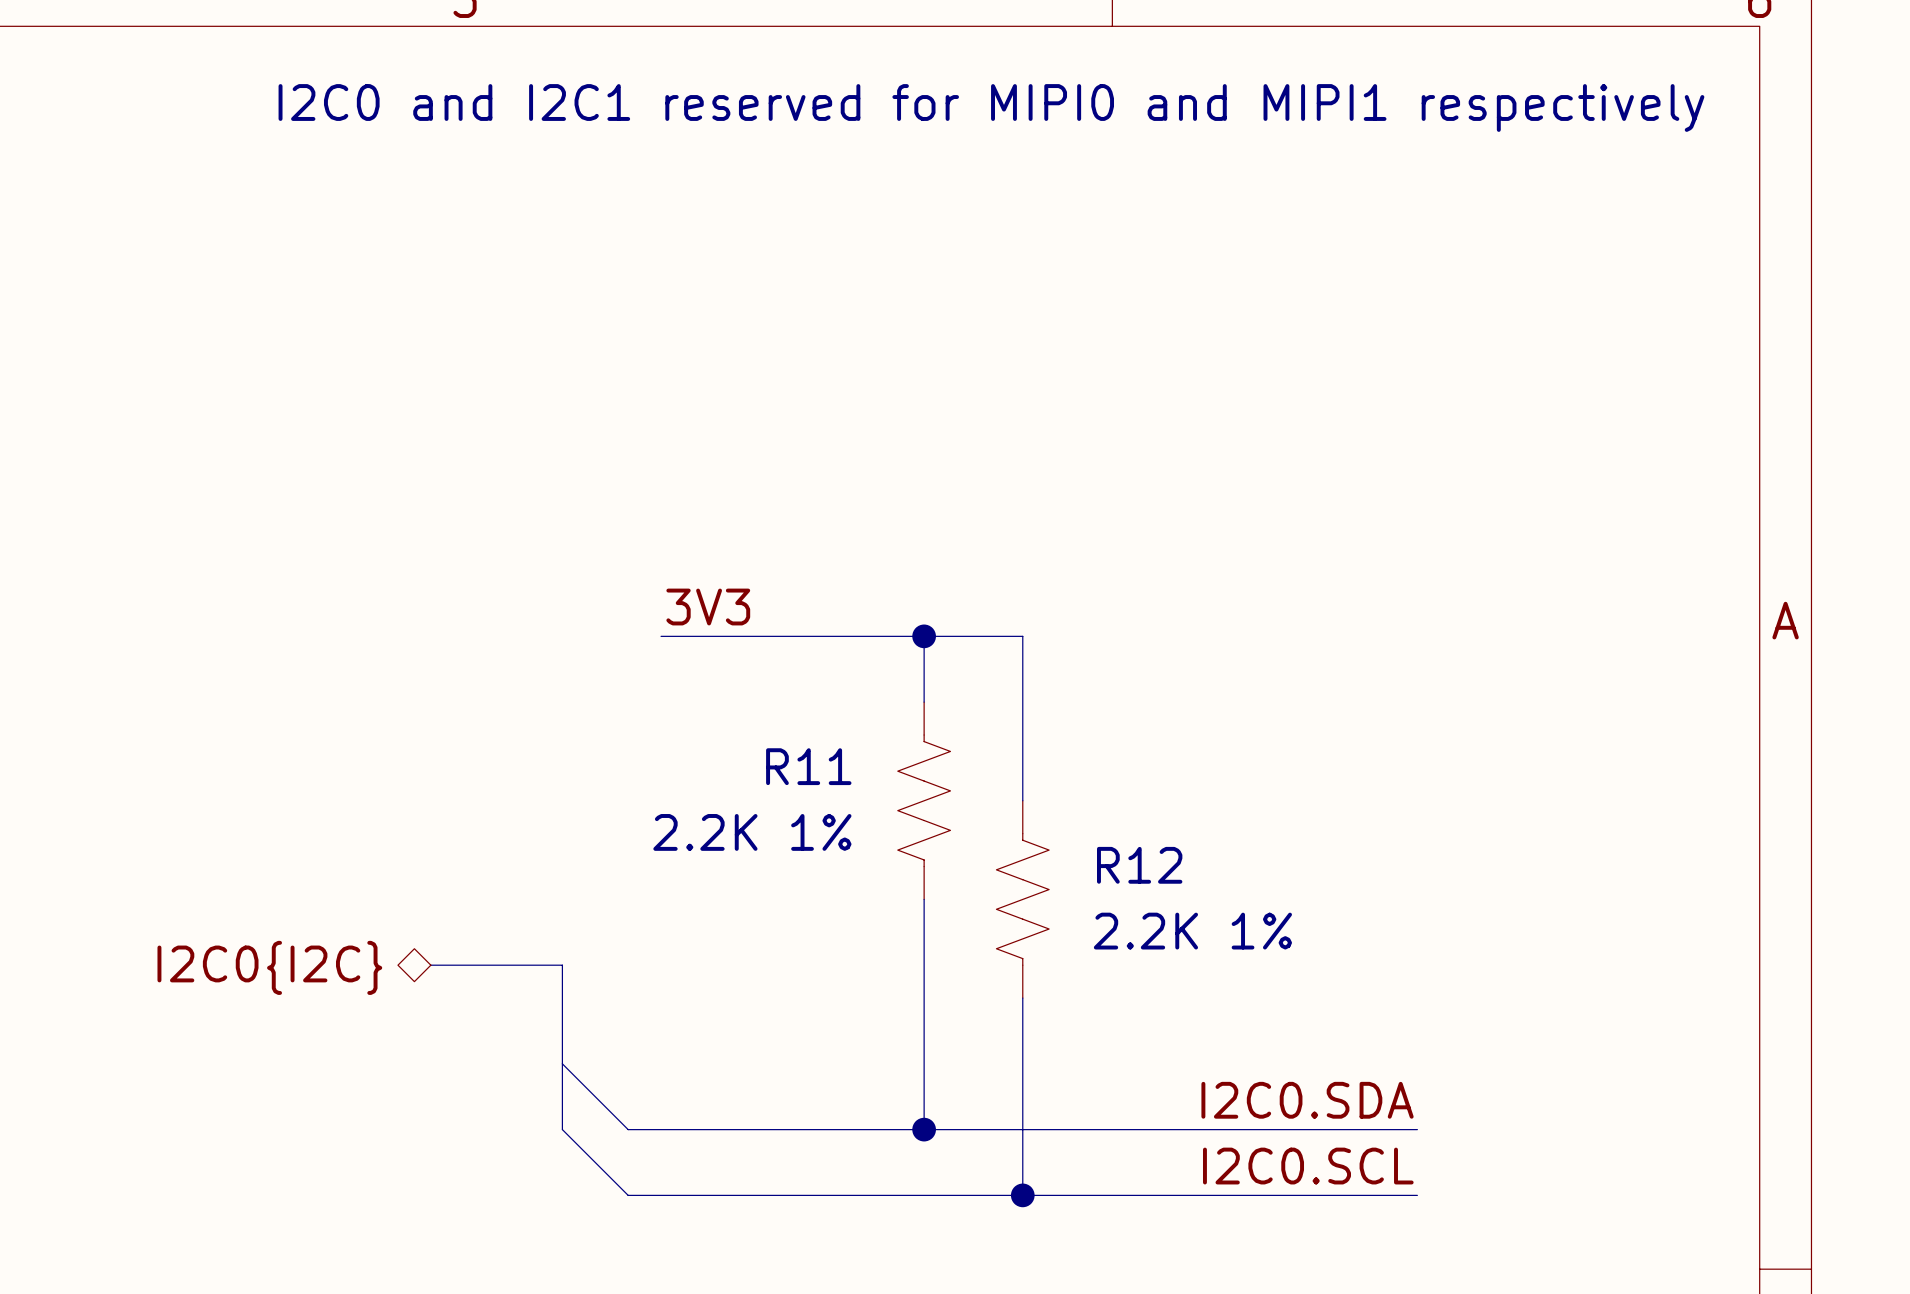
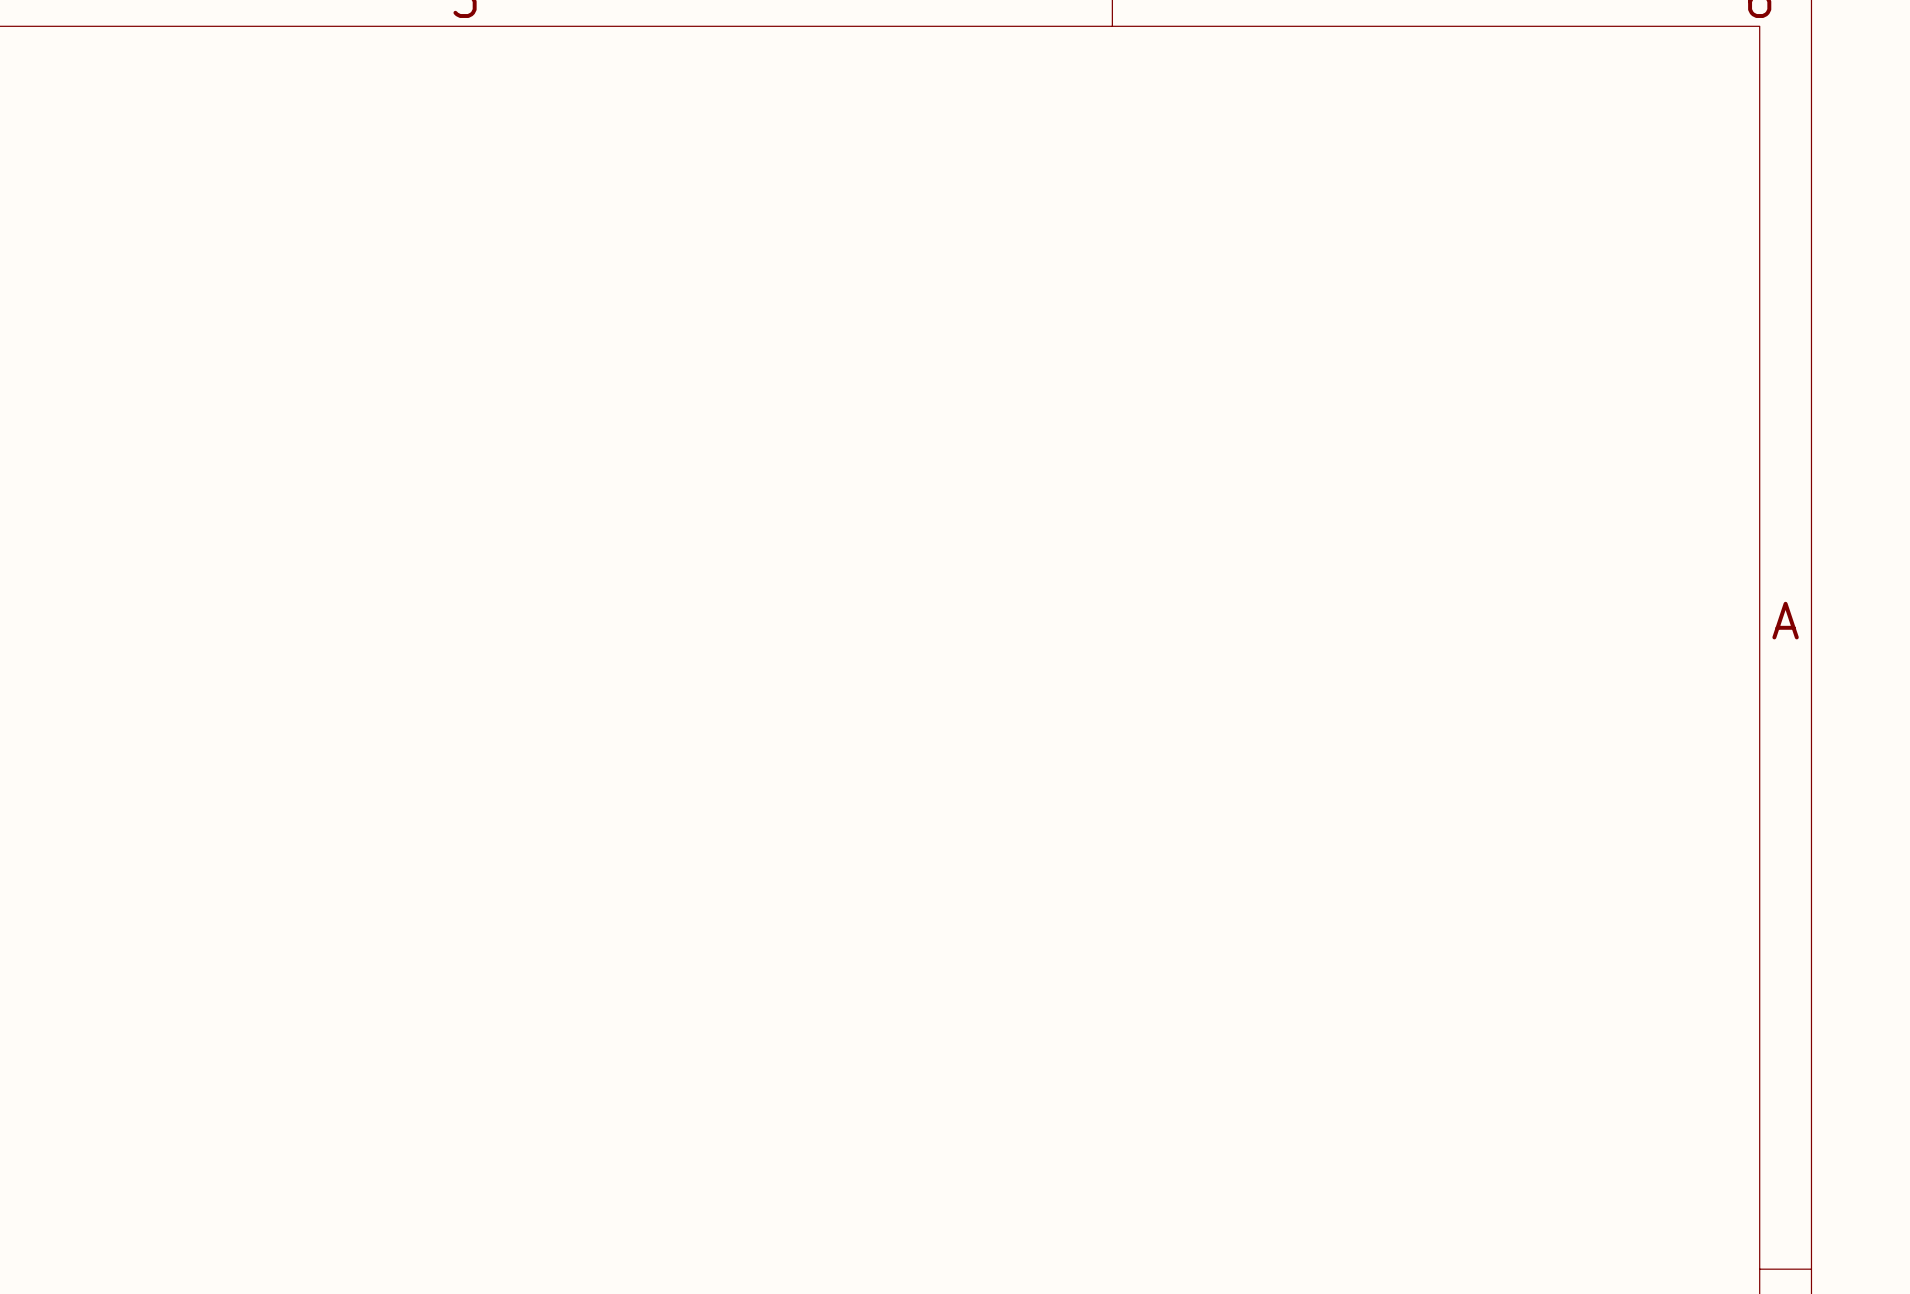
text: I2C0 and I2C1 reserved for MIPI0 and MIPI1 respectively (991, 107) -> none
label: 3V3 (708, 607) -> none
wire: (661, 636) (1022, 636) (1022, 800) -> none
wire: (924, 636) (924, 702) -> none
junction: (924, 636) -> none
R11: 2.2K 1% (924, 800) -> none
wire: (924, 899) (924, 1129) -> none
R12: 2.2K 1% (1022, 899) -> none
bus: (430, 965) (562, 965) (562, 1129) -> none
hierarchical label: I2C0{I2C} (269, 967) -> none
wire: (1022, 998) (1022, 1195) -> none
wire: (562, 1063) (628, 1129) (1417, 1129) -> none
label: I2C0.SDA (1307, 1100) -> none
wire: (562, 1129) (628, 1195) (1417, 1195) -> none
junction: (924, 1129) -> none
label: I2C0.SCL (1308, 1166) -> none
junction: (1022, 1195) -> none

